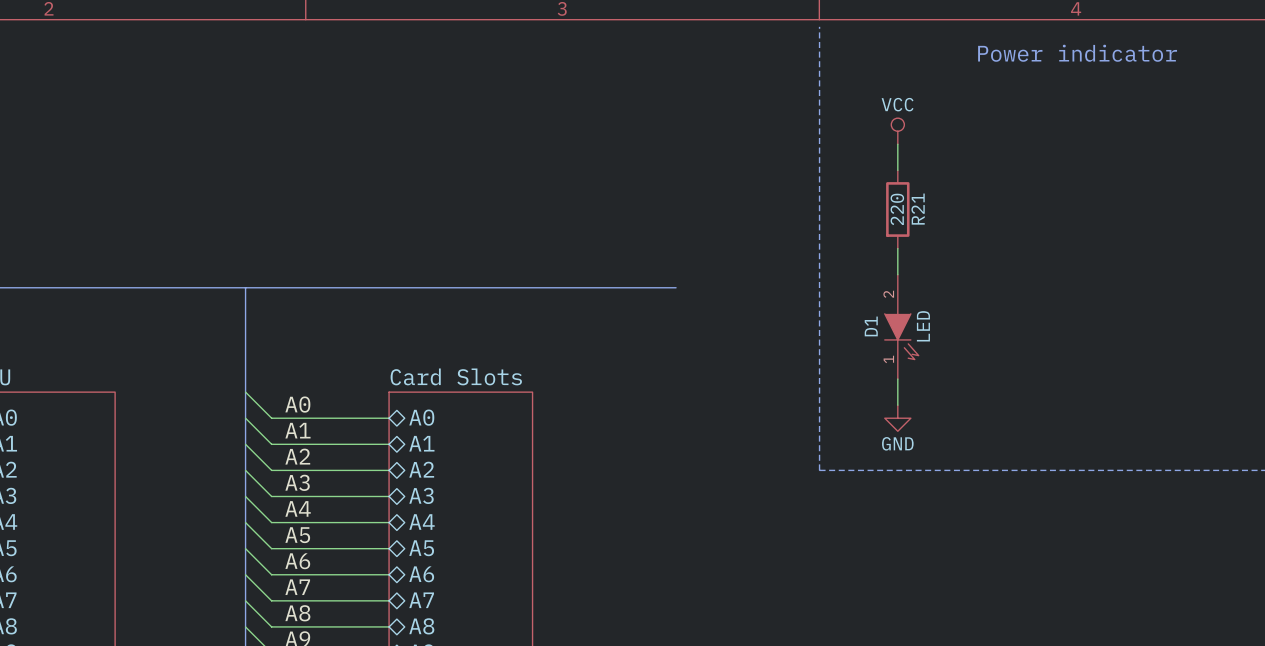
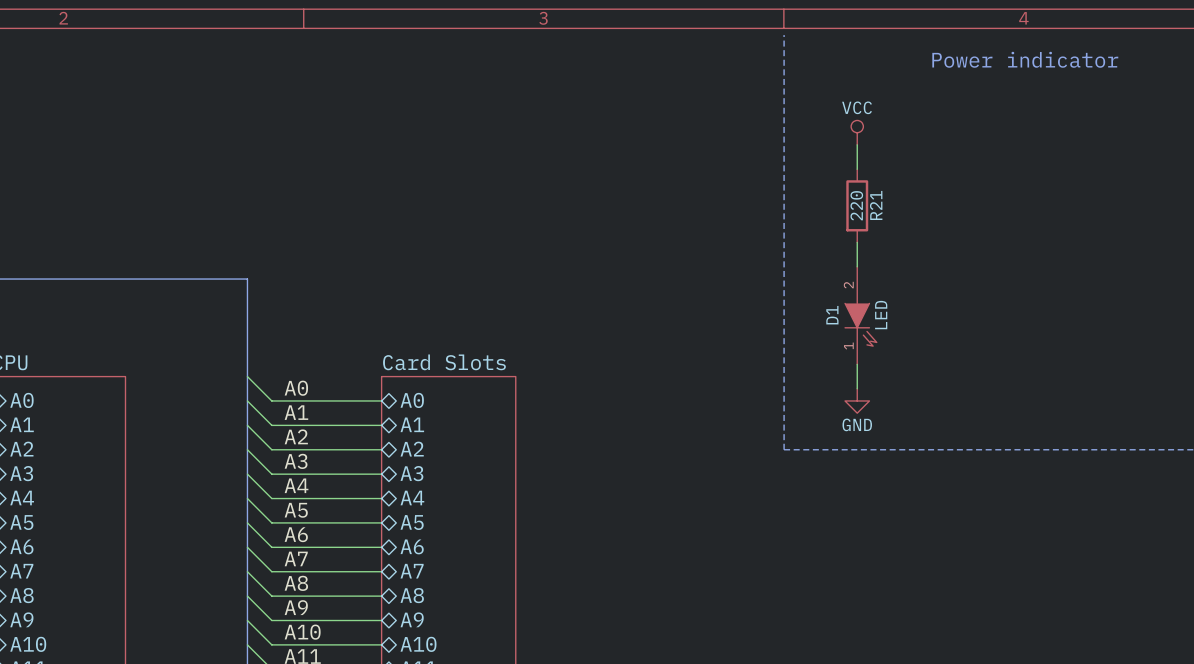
bus: (245, 287) (676, 287) -> none

